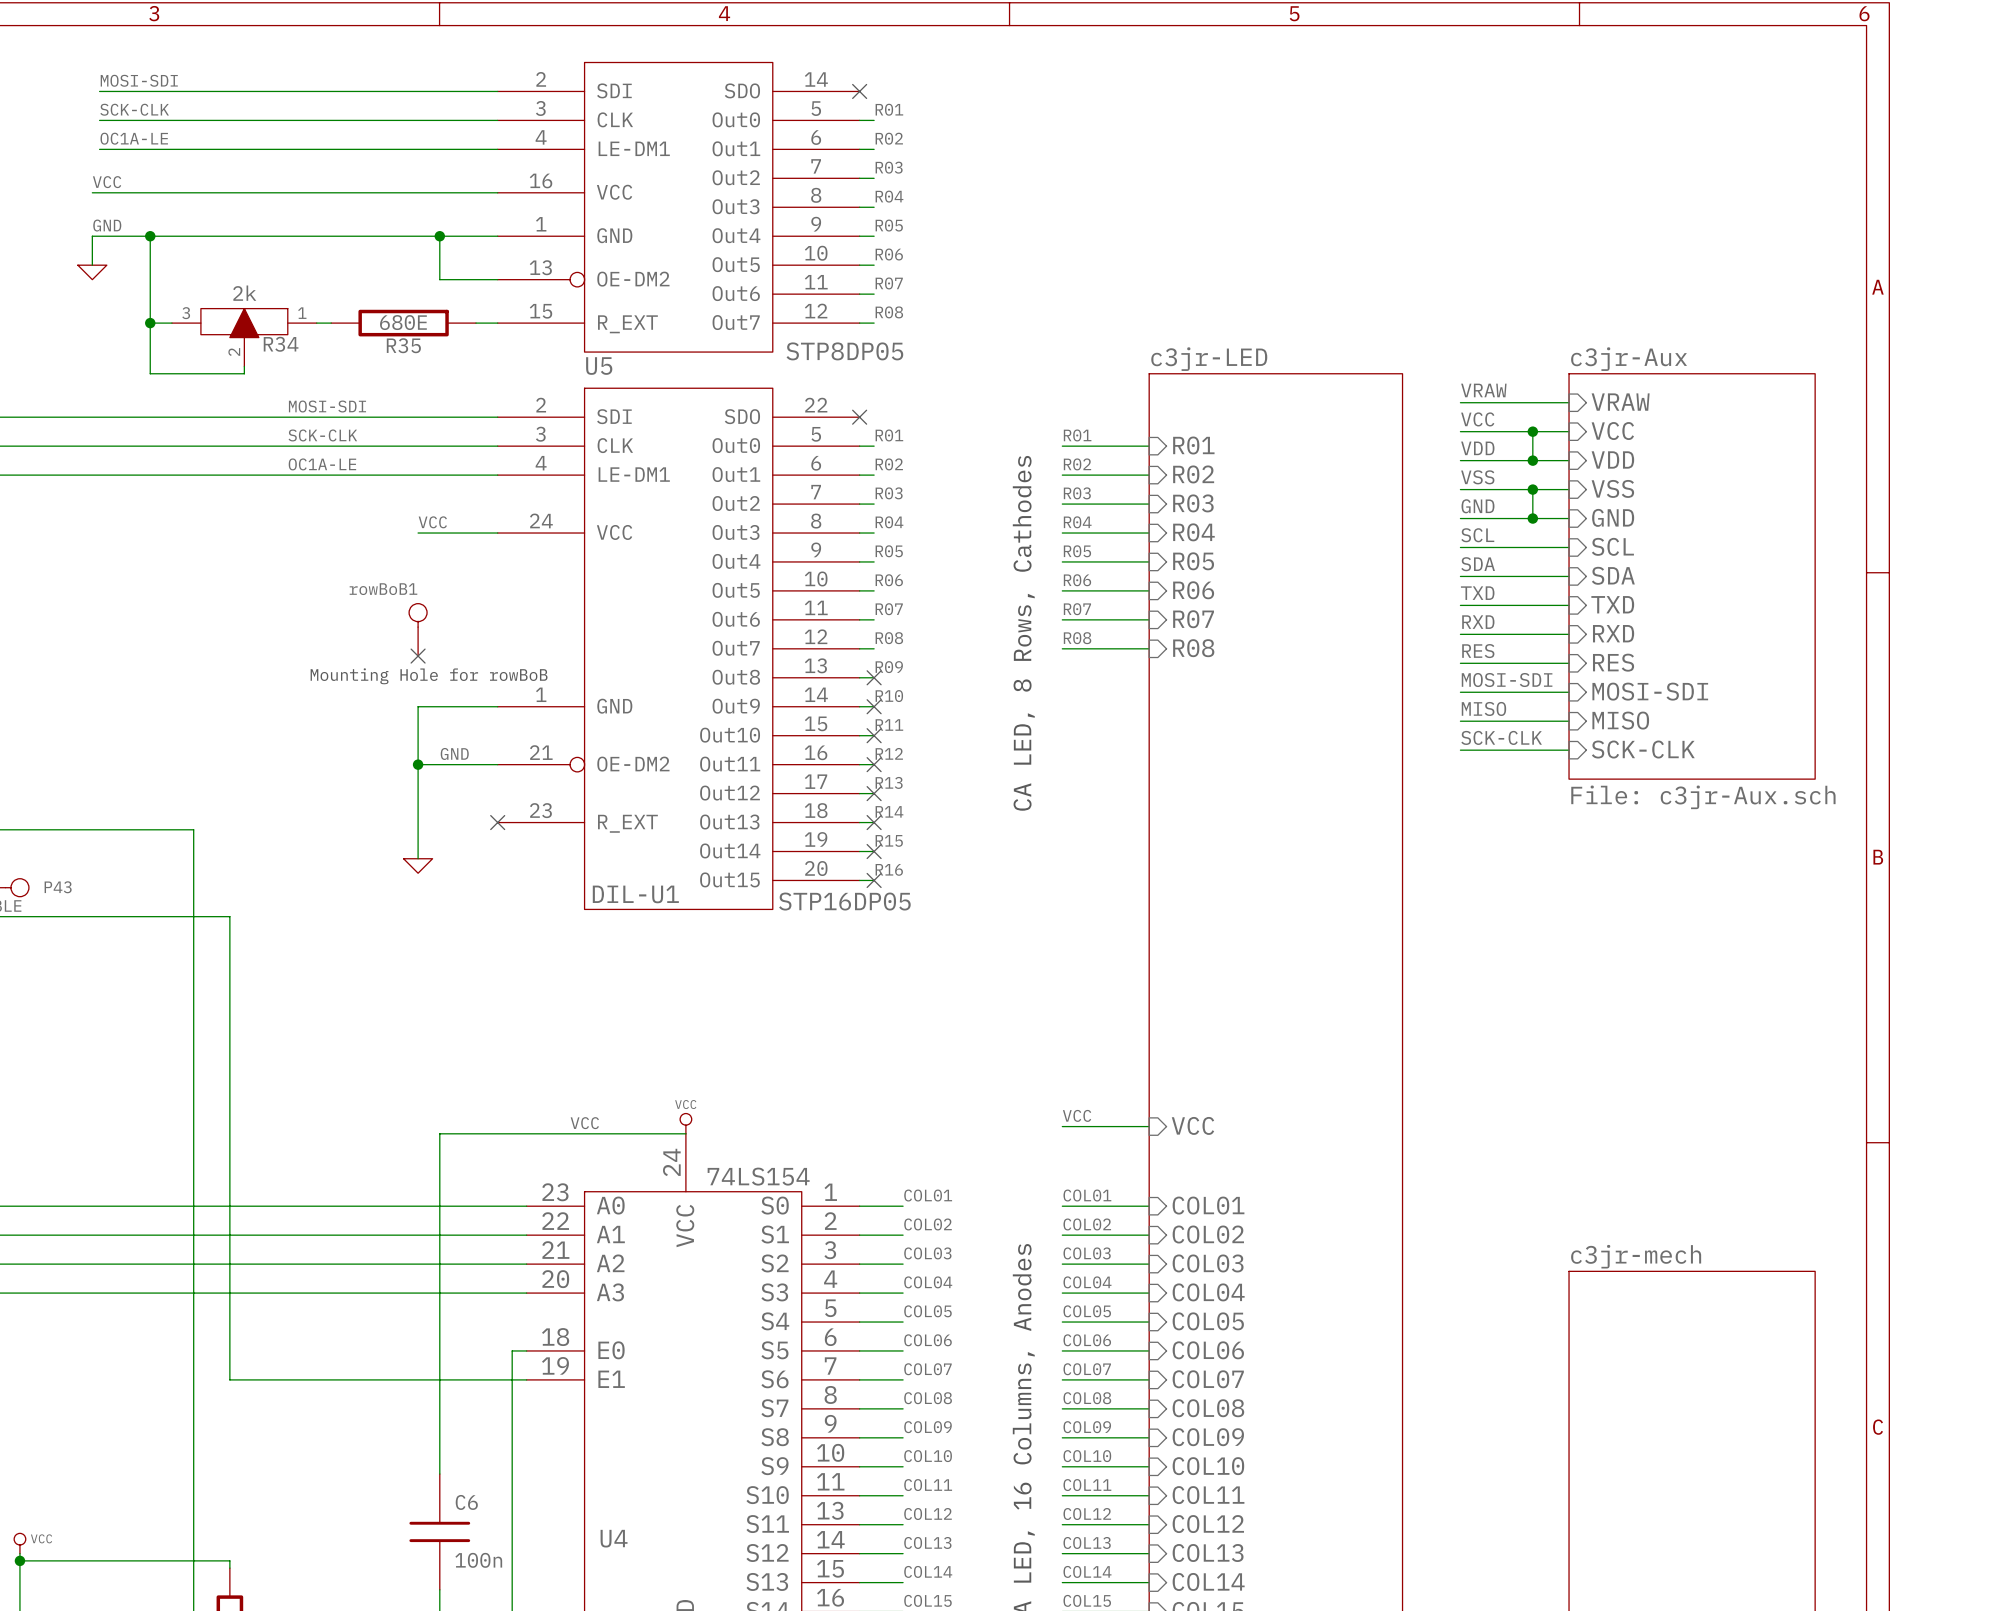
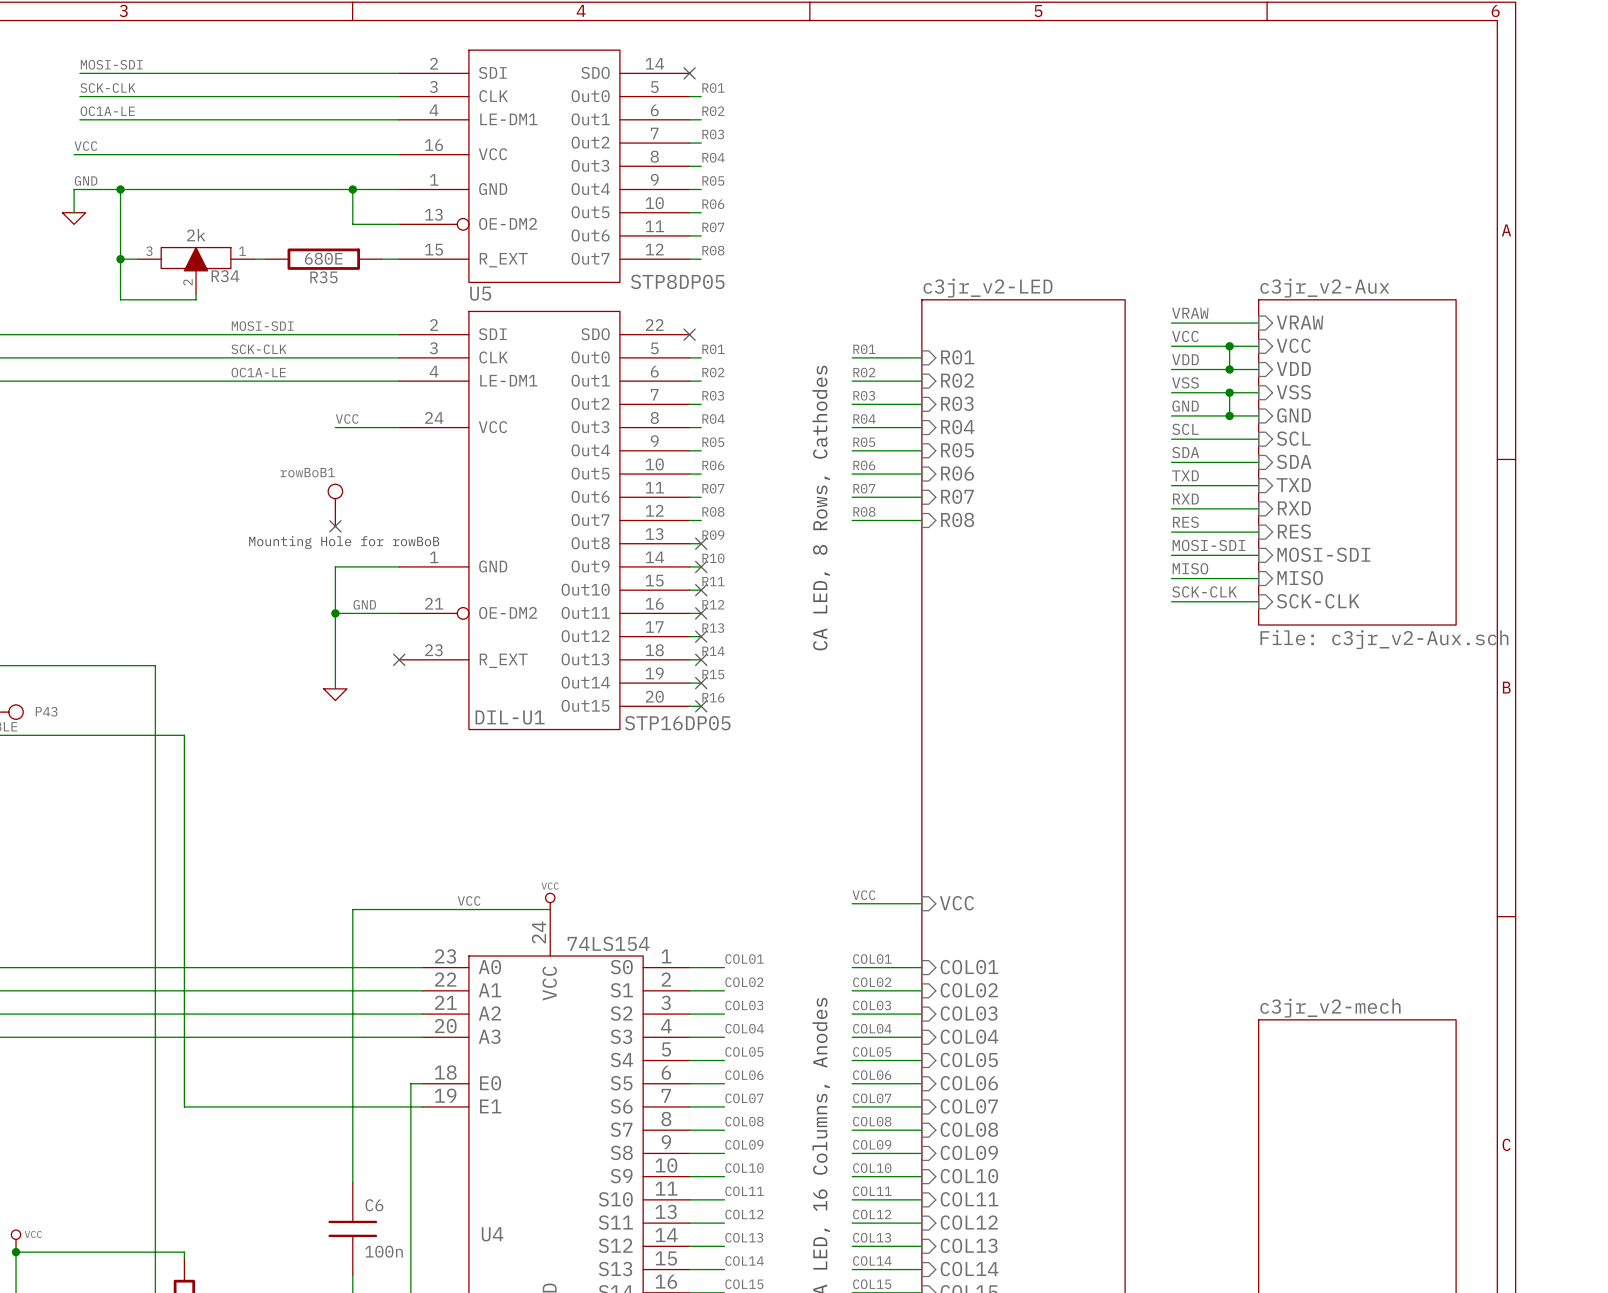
sheet c3jr-LED name: c3jr-LED (1209, 359) -> c3jr_v2-LED (988, 288)
sheet c3jr-Aux name: c3jr-Aux (1629, 359) -> c3jr_v2-Aux (1324, 288)
sheet c3jr-Aux value: File: c3jr-Aux.sch (1703, 797) -> File: c3jr_v2-Aux.sch (1384, 639)
sheet c3jr-mech name: c3jr-mech (1636, 1256) -> c3jr_v2-mech (1330, 1008)

